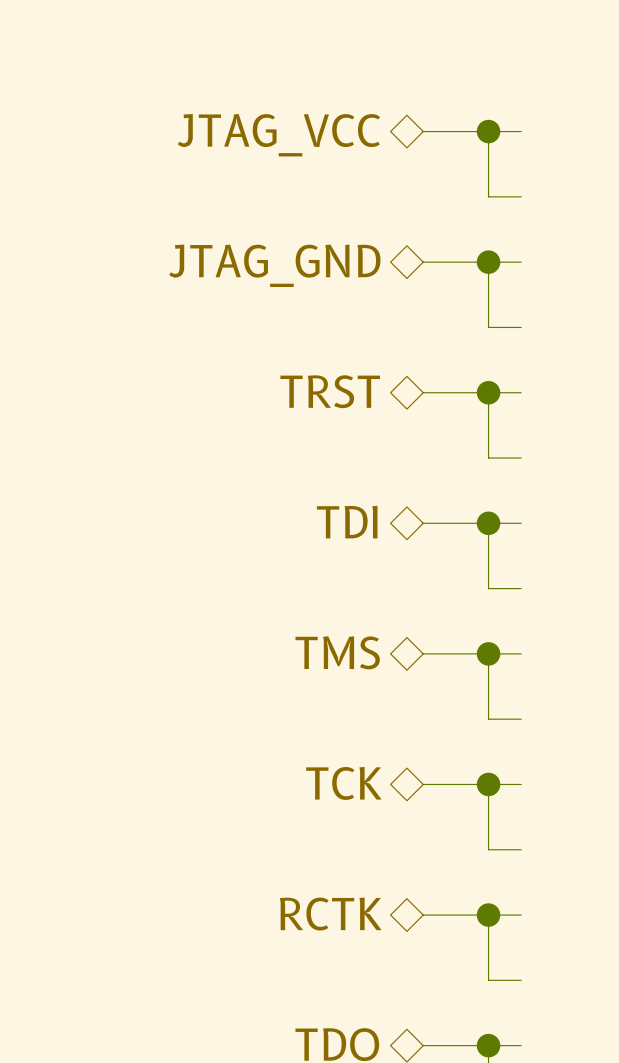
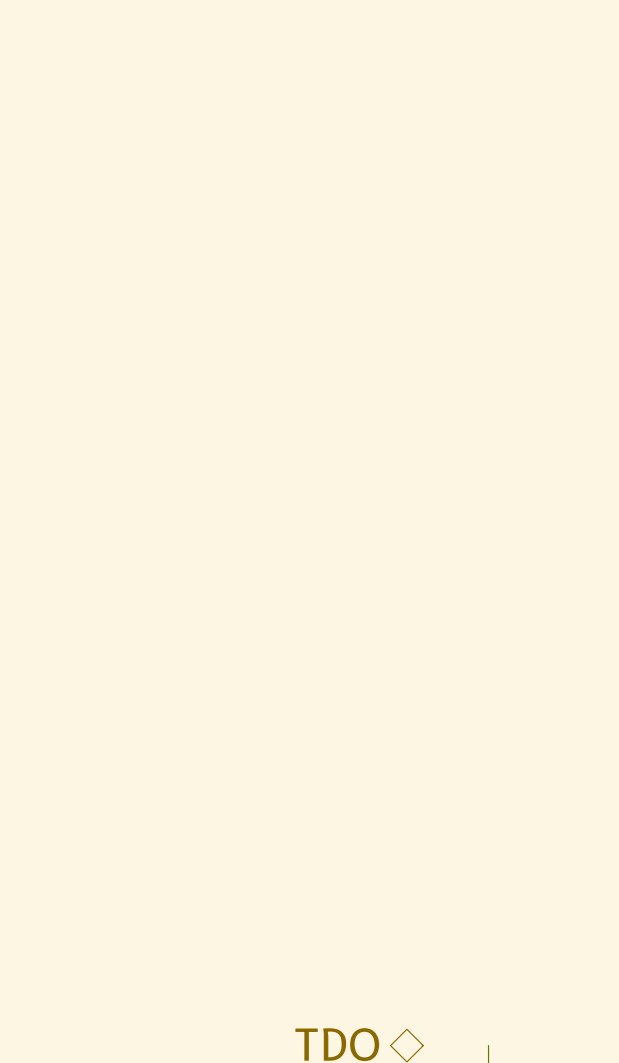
wire: (423, 131) (521, 131) -> none
wire: (488, 131) (488, 196) (521, 196) -> none
junction: (488, 131) -> none
hierarchical label: JTAG_VCC (278, 135) -> none
wire: (423, 262) (521, 262) -> none
wire: (488, 262) (488, 327) (521, 327) -> none
junction: (488, 262) -> none
hierarchical label: JTAG_GND (274, 265) -> none
hierarchical label: TRST (330, 391) -> none
wire: (423, 392) (521, 392) -> none
wire: (488, 392) (488, 458) (521, 458) -> none
junction: (488, 392) -> none
hierarchical label: TDI (347, 522) -> none
wire: (423, 523) (521, 523) -> none
wire: (488, 523) (488, 588) (521, 588) -> none
junction: (488, 523) -> none
hierarchical label: TMS (337, 652) -> none
wire: (423, 653) (521, 653) -> none
wire: (488, 653) (488, 719) (521, 719) -> none
junction: (488, 653) -> none
hierarchical label: TCK (343, 783) -> none
wire: (423, 784) (521, 784) -> none
wire: (488, 784) (488, 849) (521, 849) -> none
junction: (488, 784) -> none
hierarchical label: RCTK (330, 914) -> none
wire: (423, 915) (521, 915) -> none
wire: (488, 915) (488, 980) (521, 980) -> none
junction: (488, 915) -> none
wire: (423, 1045) (521, 1045) -> none
junction: (488, 1045) -> none

